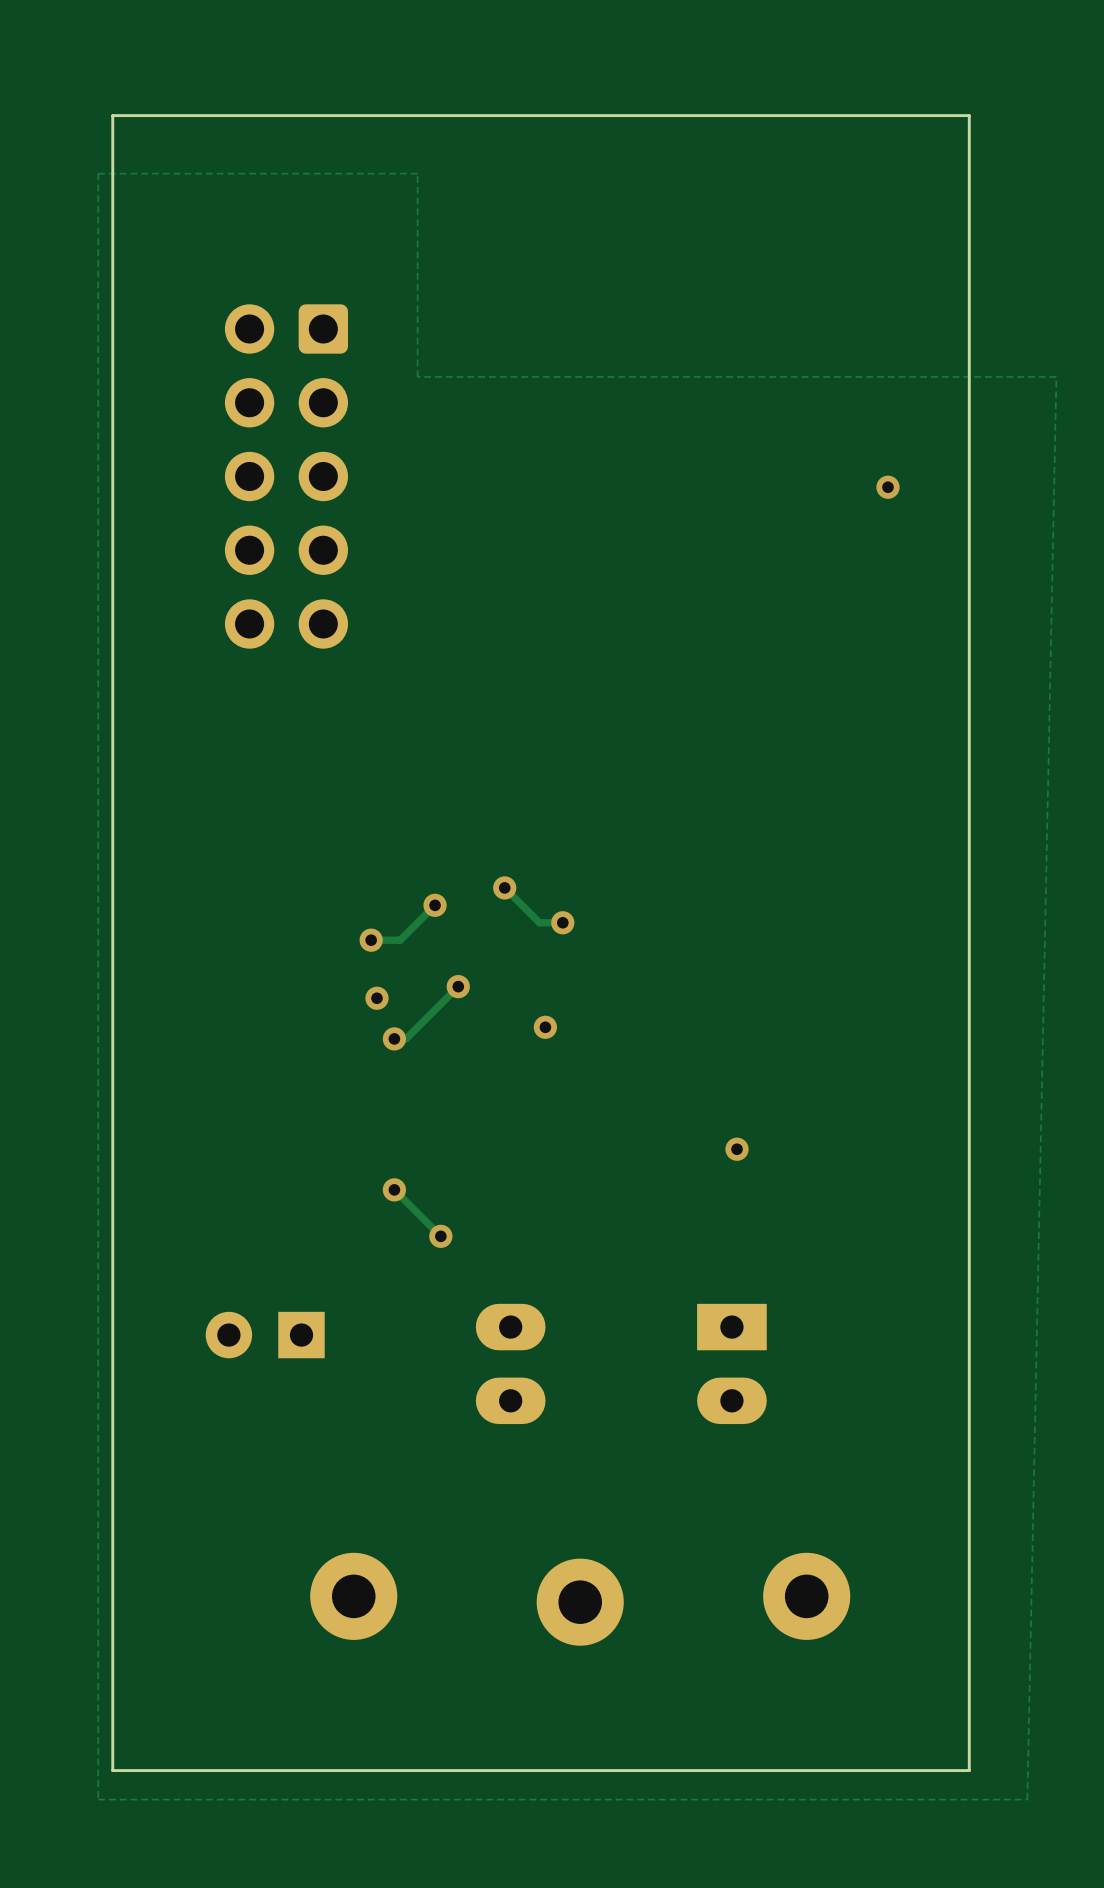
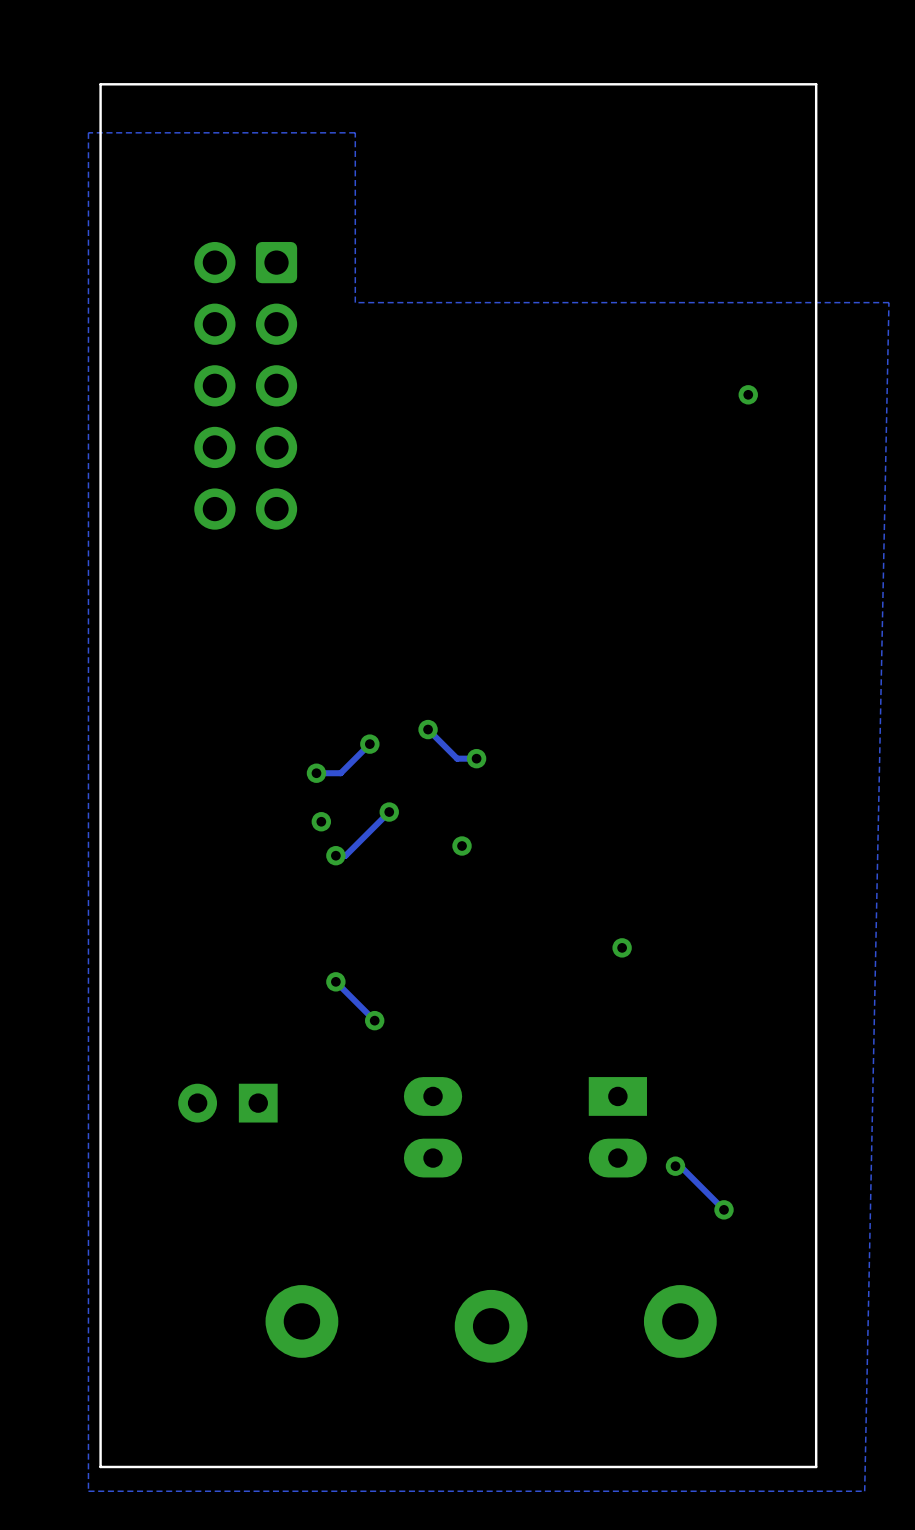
track: none -> (675, 1166) (680, 1166) (724, 1209)
via: none -> (675, 1166)
via: none -> (724, 1209)

